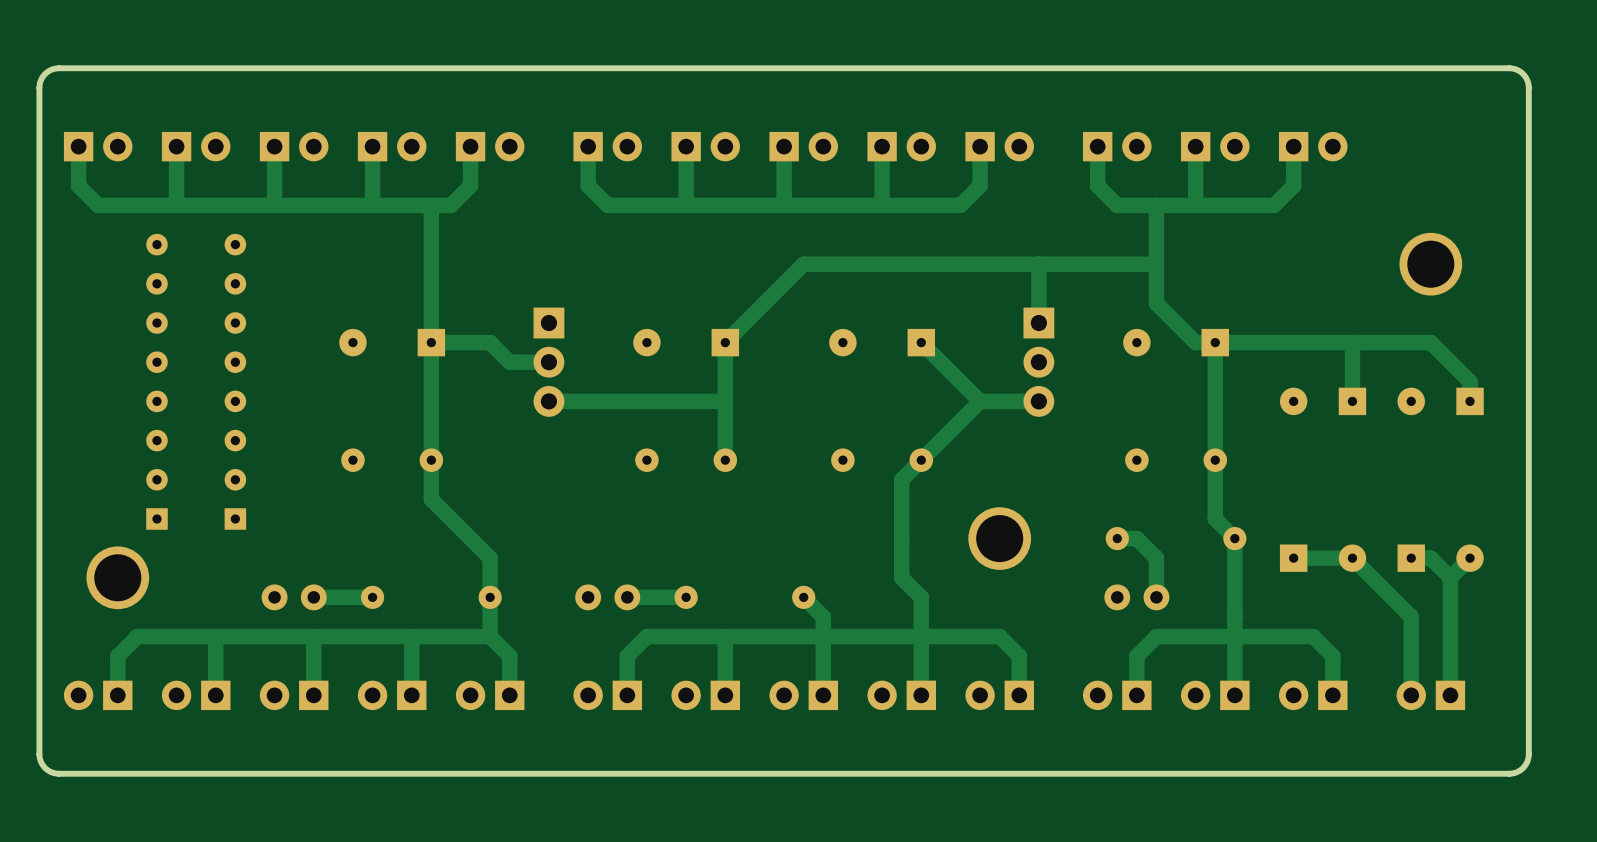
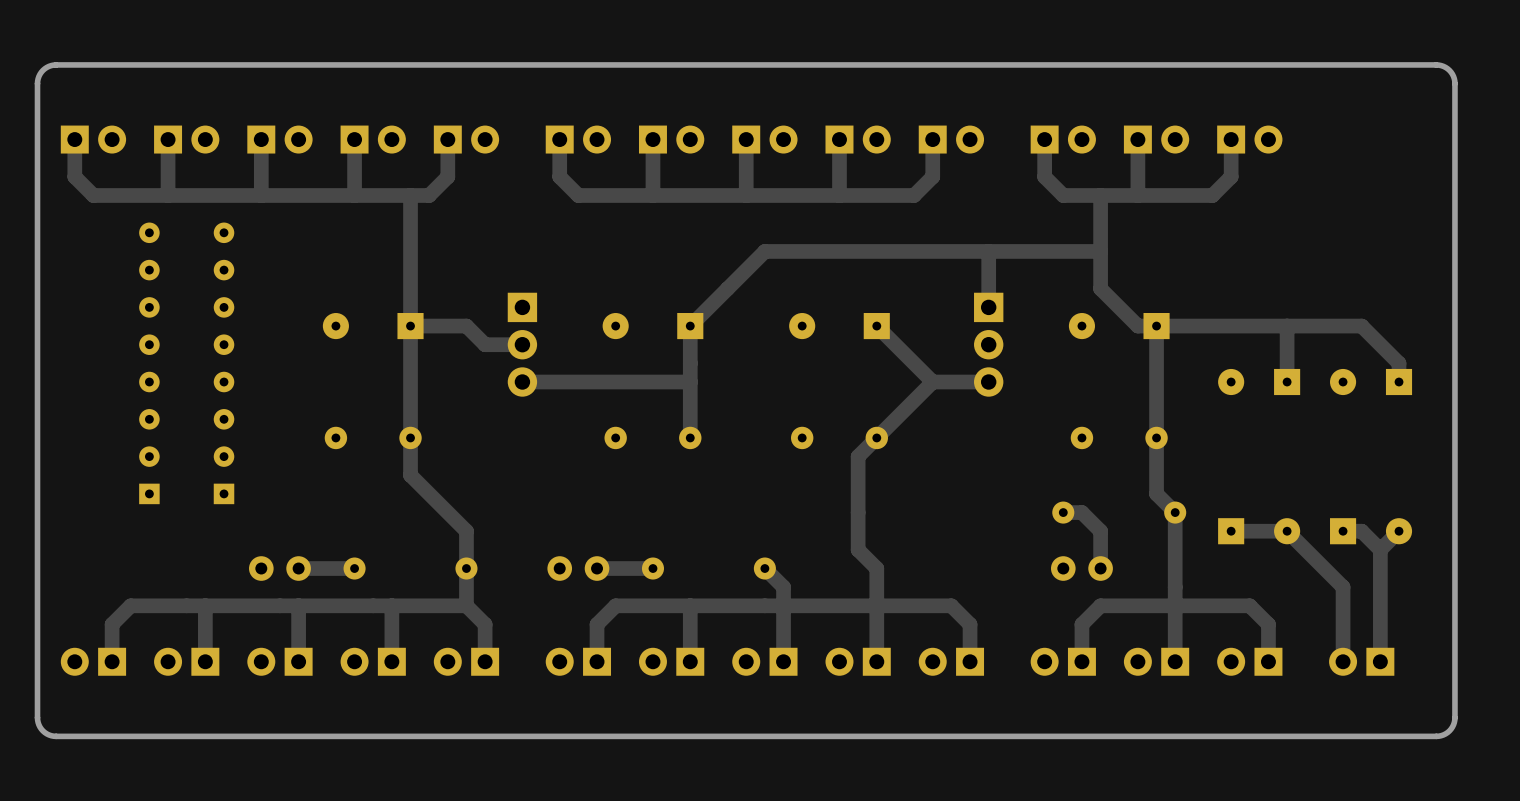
part: (1430, 264) -> none
part: (999, 538) -> none
part: (117, 577) -> none

